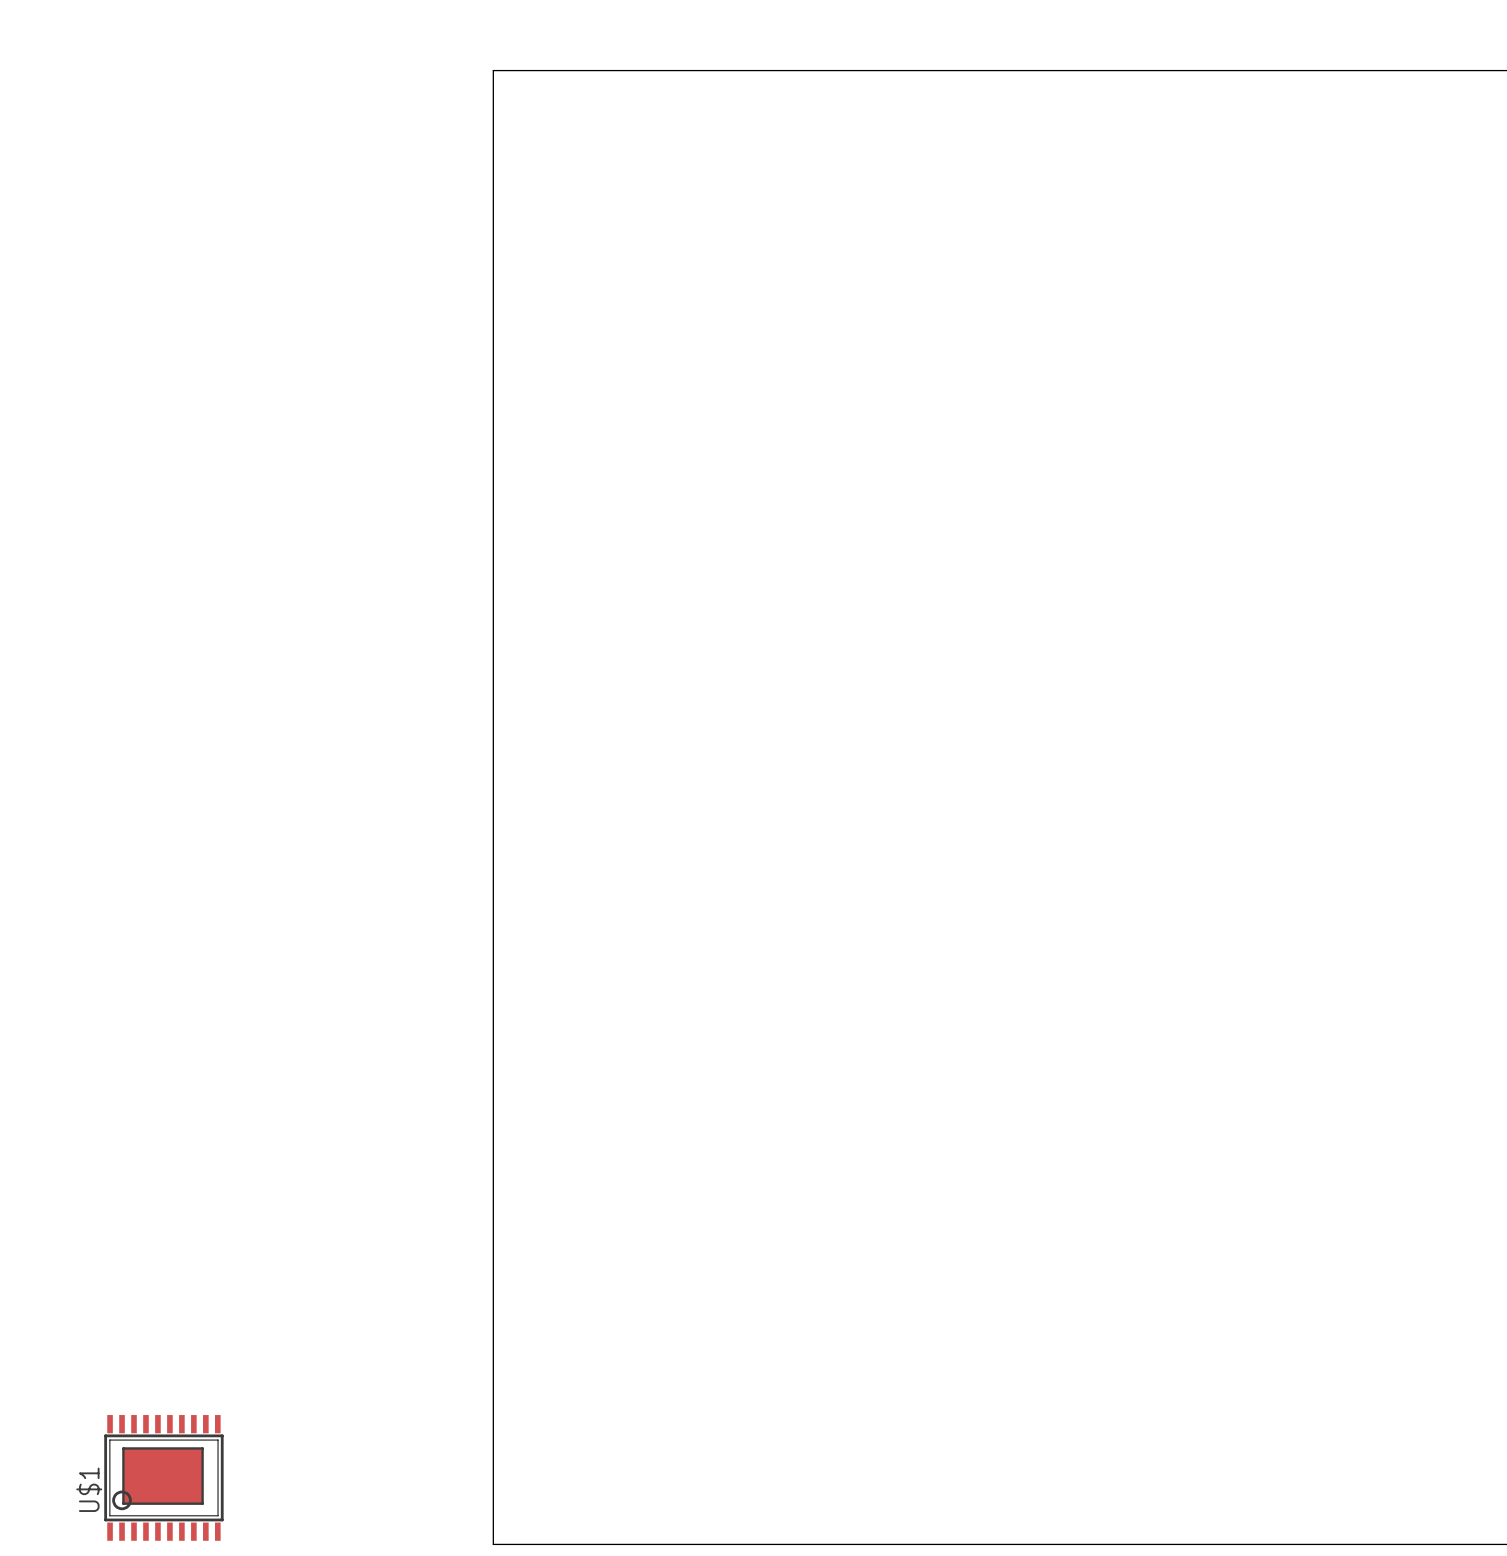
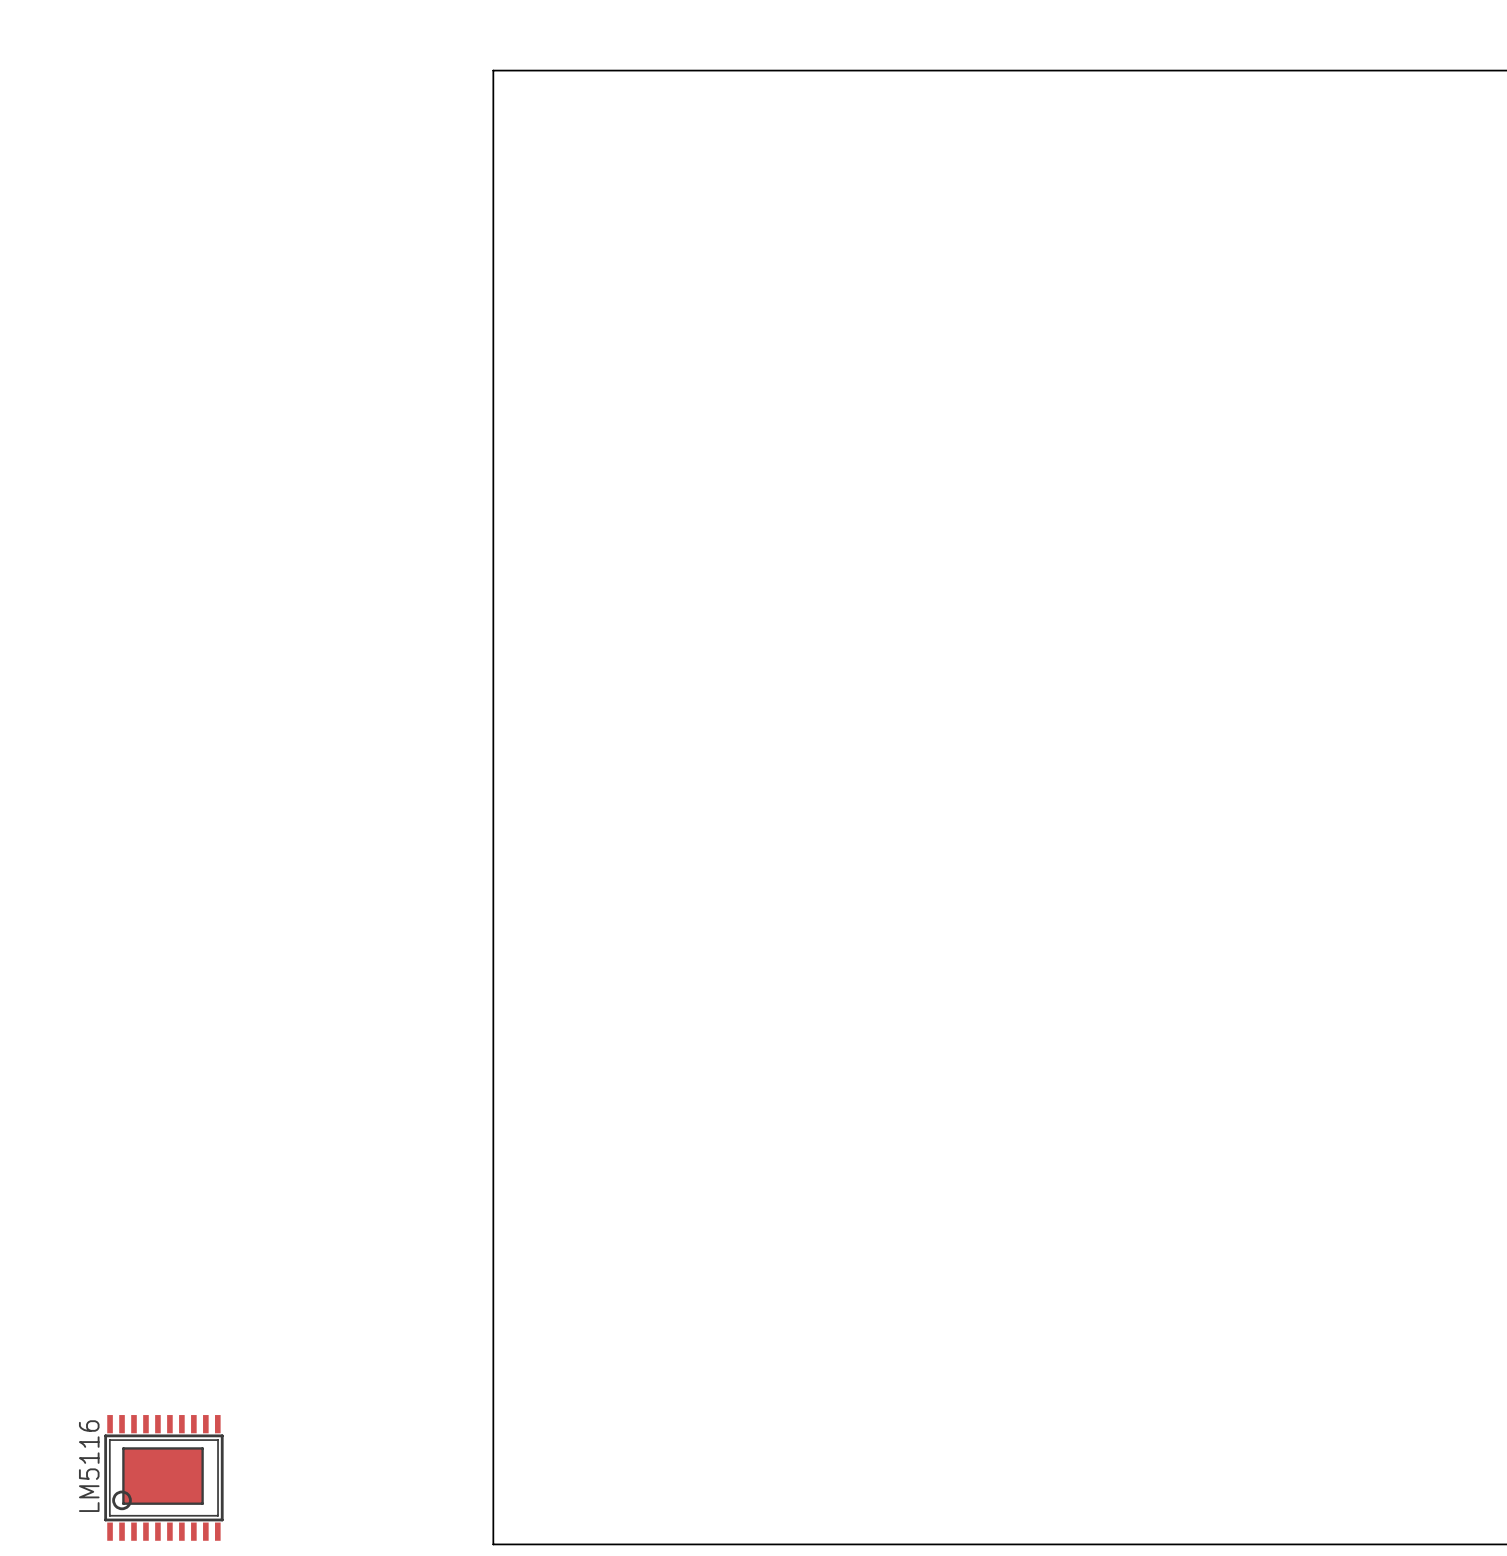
U$1 name: U$1 (89, 1489) -> LM5116 (89, 1466)

